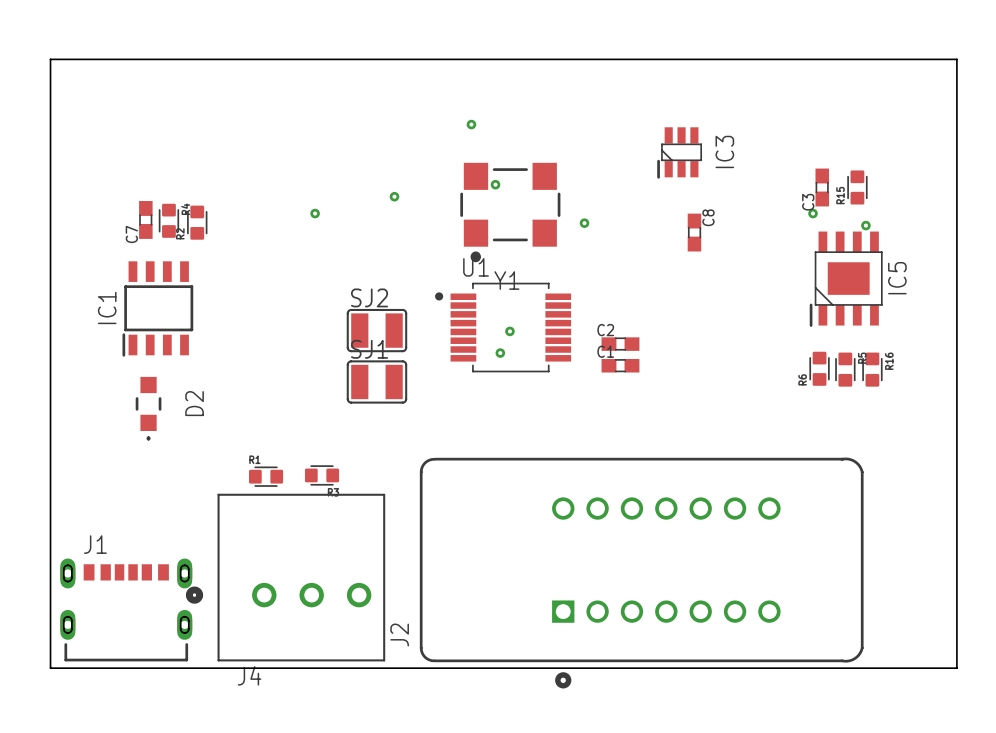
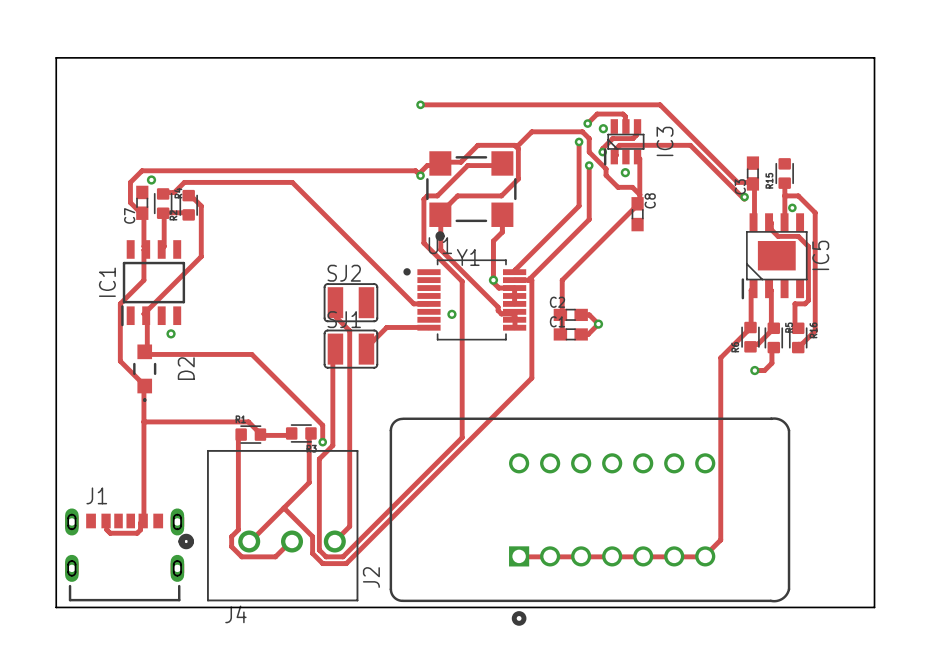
track: none -> (420, 104) (660, 104) (737, 182) (751, 182) (754, 185) (753, 222)
via position: (471, 124) -> (420, 104)
track: none -> (587, 123) (597, 114) (622, 114) (625, 116) (625, 126)
via: none -> (587, 123)
track: none -> (637, 126) (636, 135) (633, 138) (612, 138) (602, 148) (602, 152)
via: none -> (603, 128)
track: none -> (579, 141) (579, 206) (514, 272)
via: none -> (579, 141)
track: none -> (516, 147) (531, 131) (582, 131) (589, 138) (589, 152) (606, 168) (606, 175) (618, 187) (632, 187) (639, 194)
via: none -> (602, 152)
track: none -> (614, 157) (616, 148) (619, 145) (690, 145) (744, 199)
track: none -> (637, 157) (639, 158) (639, 202) (562, 280) (562, 313) (560, 314) (562, 317) (562, 334) (560, 334)
track: none -> (502, 163) (501, 165) (467, 165) (437, 195) (427, 195) (423, 199) (423, 243) (462, 281) (462, 437) (342, 556) (326, 556) (319, 550) (319, 459) (332, 445) (332, 351) (335, 349)
track: none -> (589, 165) (589, 219) (528, 280) (514, 280)
via: none -> (589, 165)
via: (495, 184) -> none
via: none -> (625, 172)
via: none -> (420, 175)
via: none -> (151, 180)
via: (394, 196) -> none
track: none -> (784, 183) (784, 222)
track: none -> (163, 193) (174, 192) (184, 182) (292, 182) (413, 303) (428, 303)
track: none -> (188, 195) (201, 206) (201, 256) (143, 313) (147, 317) (147, 351) (144, 351) (147, 354) (251, 354) (322, 425) (322, 442)
track: none -> (784, 195) (798, 195) (815, 212) (815, 330) (801, 344) (798, 344) (798, 347)
via: (315, 213) -> none
via: (584, 223) -> none
track: none -> (188, 214) (187, 212) (163, 213) (164, 246) (161, 249)
track: none -> (502, 214) (502, 232) (493, 241) (493, 282) (498, 288) (514, 288) (514, 303)
track: none -> (769, 222) (771, 222) (771, 229) (778, 236) (798, 236) (808, 246) (808, 300) (805, 303) (794, 303) (794, 327) (798, 328)
track: none -> (530, 278) (531, 280) (531, 378) (346, 563) (322, 563) (312, 553) (312, 536) (283, 507)
via: none -> (493, 280)
track: none -> (753, 288) (751, 290) (751, 327) (720, 357) (720, 539) (703, 556) (519, 556)
track: none -> (769, 288) (771, 290) (771, 327) (773, 328) (757, 344) (751, 344) (750, 346)
track: none -> (335, 302) (336, 317) (349, 330) (349, 526) (334, 541)
via: (509, 331) -> none
via: none -> (451, 314)
track: none -> (581, 314) (589, 314) (598, 324) (588, 334) (581, 334)
via: (500, 353) -> none
via: none -> (598, 324)
track: none -> (428, 327) (386, 327) (366, 349)
track: none -> (514, 327) (514, 311) (511, 313) (501, 313) (498, 310) (498, 307) (440, 249) (440, 214) (457, 195) (501, 195) (518, 179) (518, 148) (514, 145) (477, 145) (461, 162) (440, 162) (437, 165) (427, 165) (420, 172) (420, 175) (415, 170) (142, 170) (130, 182) (130, 202) (143, 216) (143, 246) (146, 249) (143, 249) (143, 280) (120, 303) (120, 361) (144, 386) (143, 519) (140, 523) (140, 529) (137, 533) (110, 533) (106, 529) (106, 520)
via: none -> (171, 333)
track: none -> (773, 347) (771, 349) (771, 363) (764, 370) (754, 370)
via: none -> (754, 370)
track: none -> (143, 421) (248, 421) (262, 435) (288, 435) (291, 433)
track: none -> (310, 433) (309, 435) (309, 482) (249, 541)
track: none -> (241, 434) (238, 435) (238, 529) (231, 536) (231, 546) (241, 556) (275, 556) (292, 541)
via: none -> (322, 442)

